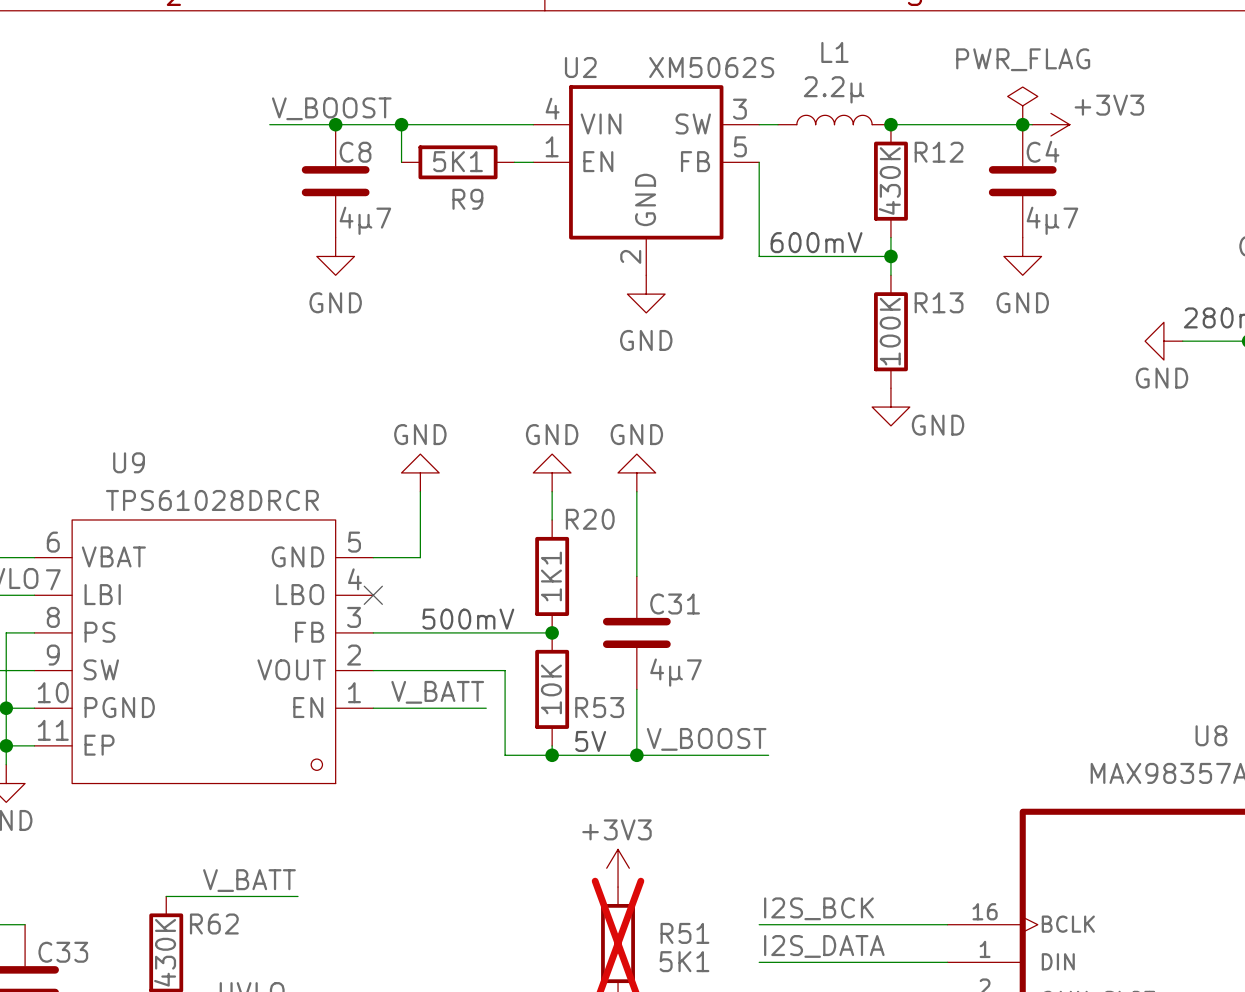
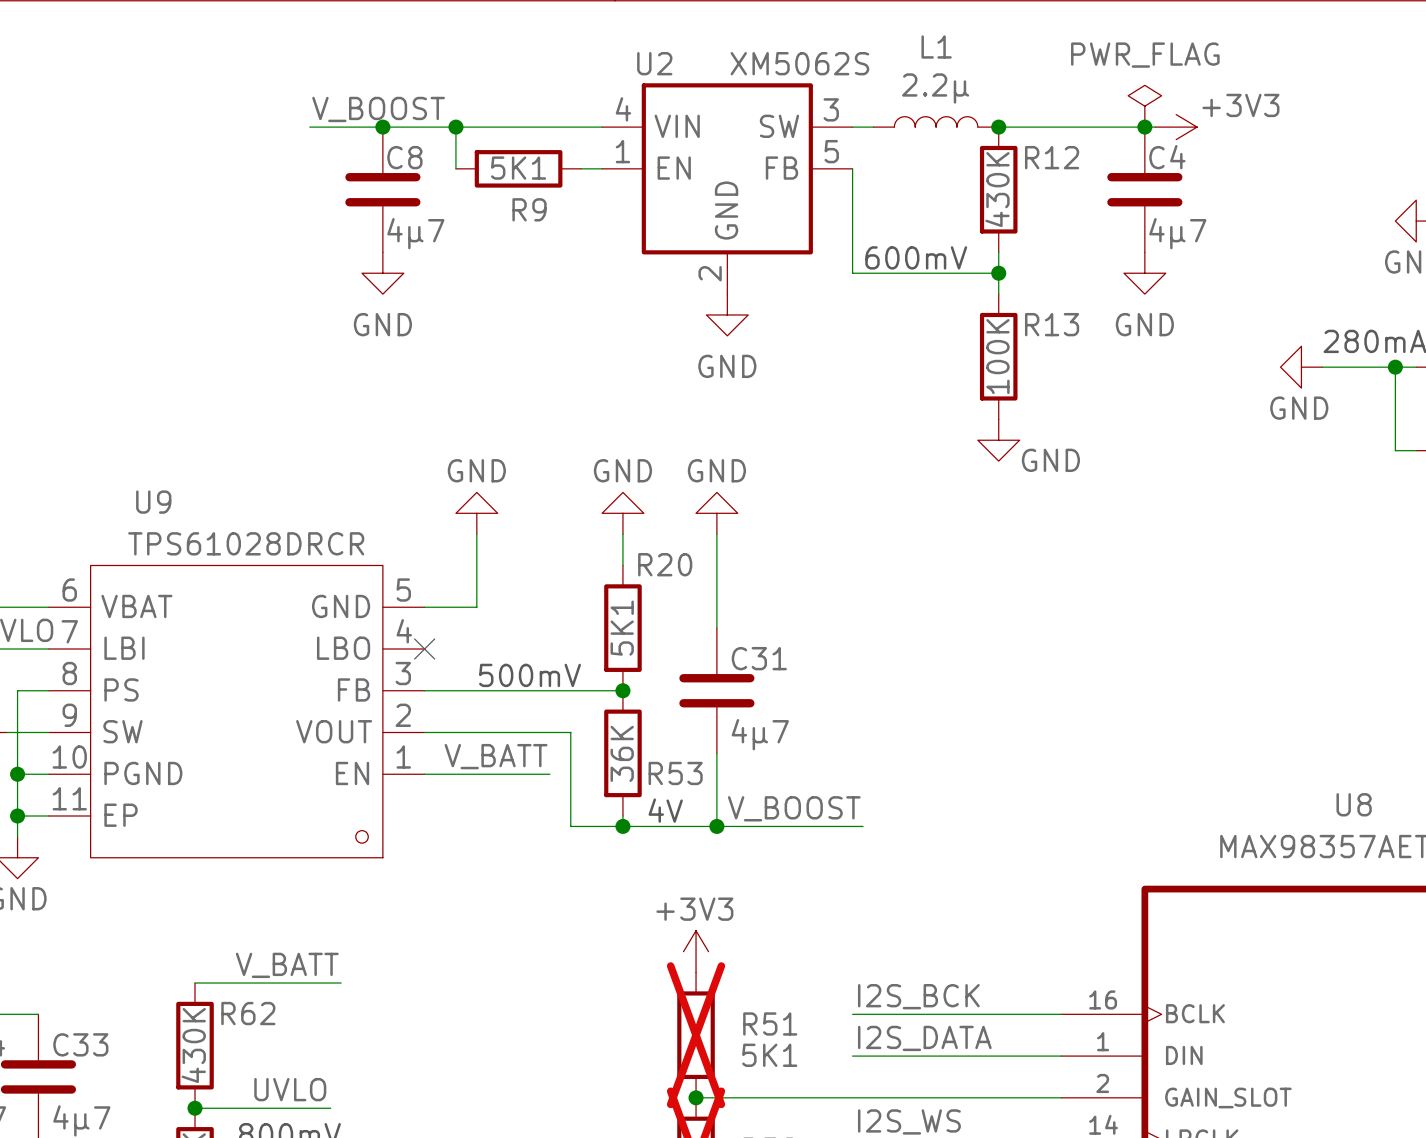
R20 value: 1K1 (551, 576) -> 5K1 (622, 628)
R53 value: 10K (551, 689) -> 36K (622, 753)
text: 5V (590, 741) -> 4V (665, 810)

